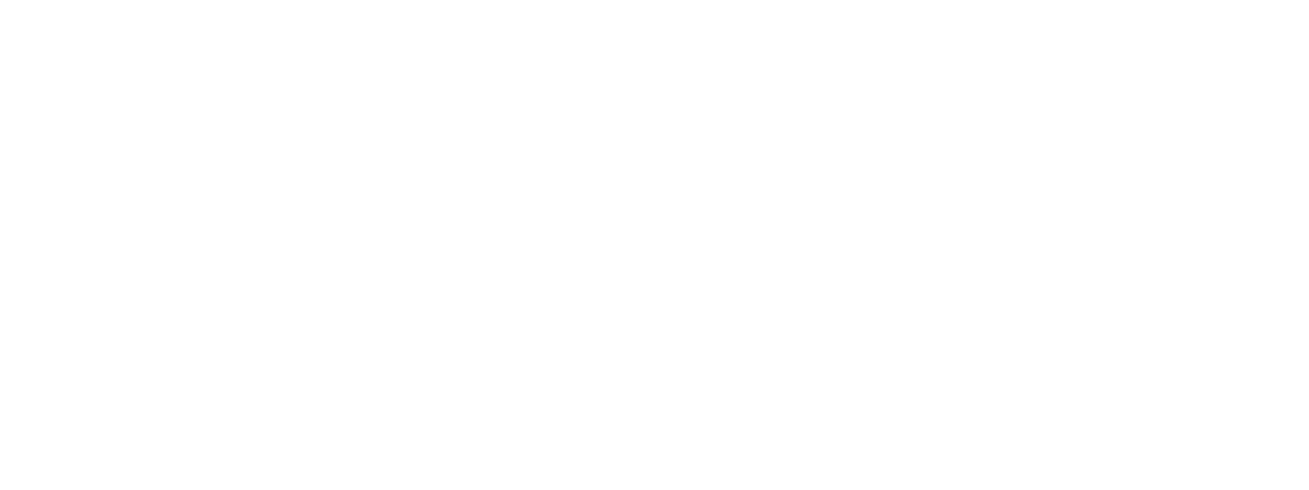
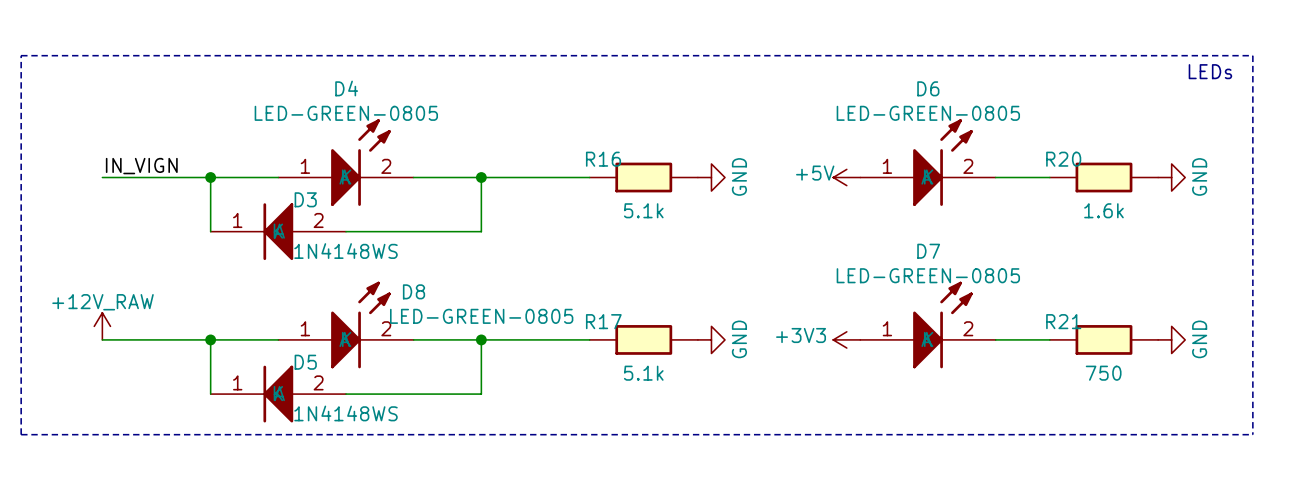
line: none -> (21, 55) (1252, 55) (1252, 434) (21, 434) (21, 55)
text: none -> LEDs (1210, 71)
D4: none -> LED-GREEN-0805 (346, 162)
D6: none -> LED-GREEN-0805 (928, 162)
label: none -> IN_VIGN (141, 166)
wire: none -> (102, 177) (278, 177)
wire: none -> (210, 177) (210, 231)
junction: none -> (210, 177)
wire: none -> (413, 177) (589, 177)
wire: none -> (481, 177) (481, 231) (346, 231)
junction: none -> (481, 177)
R16: none -> 5.1k (643, 177)
power symbol: none -> GND (711, 177)
power symbol: none -> +5V (846, 177)
wire: none -> (995, 177) (1049, 177)
R20: none -> 1.6k (1103, 177)
power symbol: none -> GND (1171, 177)
D3: none -> 1N4148WS (278, 231)
D8: none -> LED-GREEN-0805 (346, 325)
D7: none -> LED-GREEN-0805 (928, 325)
power symbol: none -> +12V_RAW (102, 326)
wire: none -> (102, 339) (278, 339)
wire: none -> (210, 339) (210, 394)
junction: none -> (210, 339)
wire: none -> (413, 339) (589, 339)
wire: none -> (481, 339) (481, 394) (346, 394)
junction: none -> (481, 339)
R17: none -> 5.1k (643, 339)
power symbol: none -> GND (711, 339)
power symbol: none -> +3V3 (846, 339)
wire: none -> (995, 339) (1049, 339)
R21: none -> 750 (1103, 339)
power symbol: none -> GND (1171, 339)
D5: none -> 1N4148WS (278, 394)

